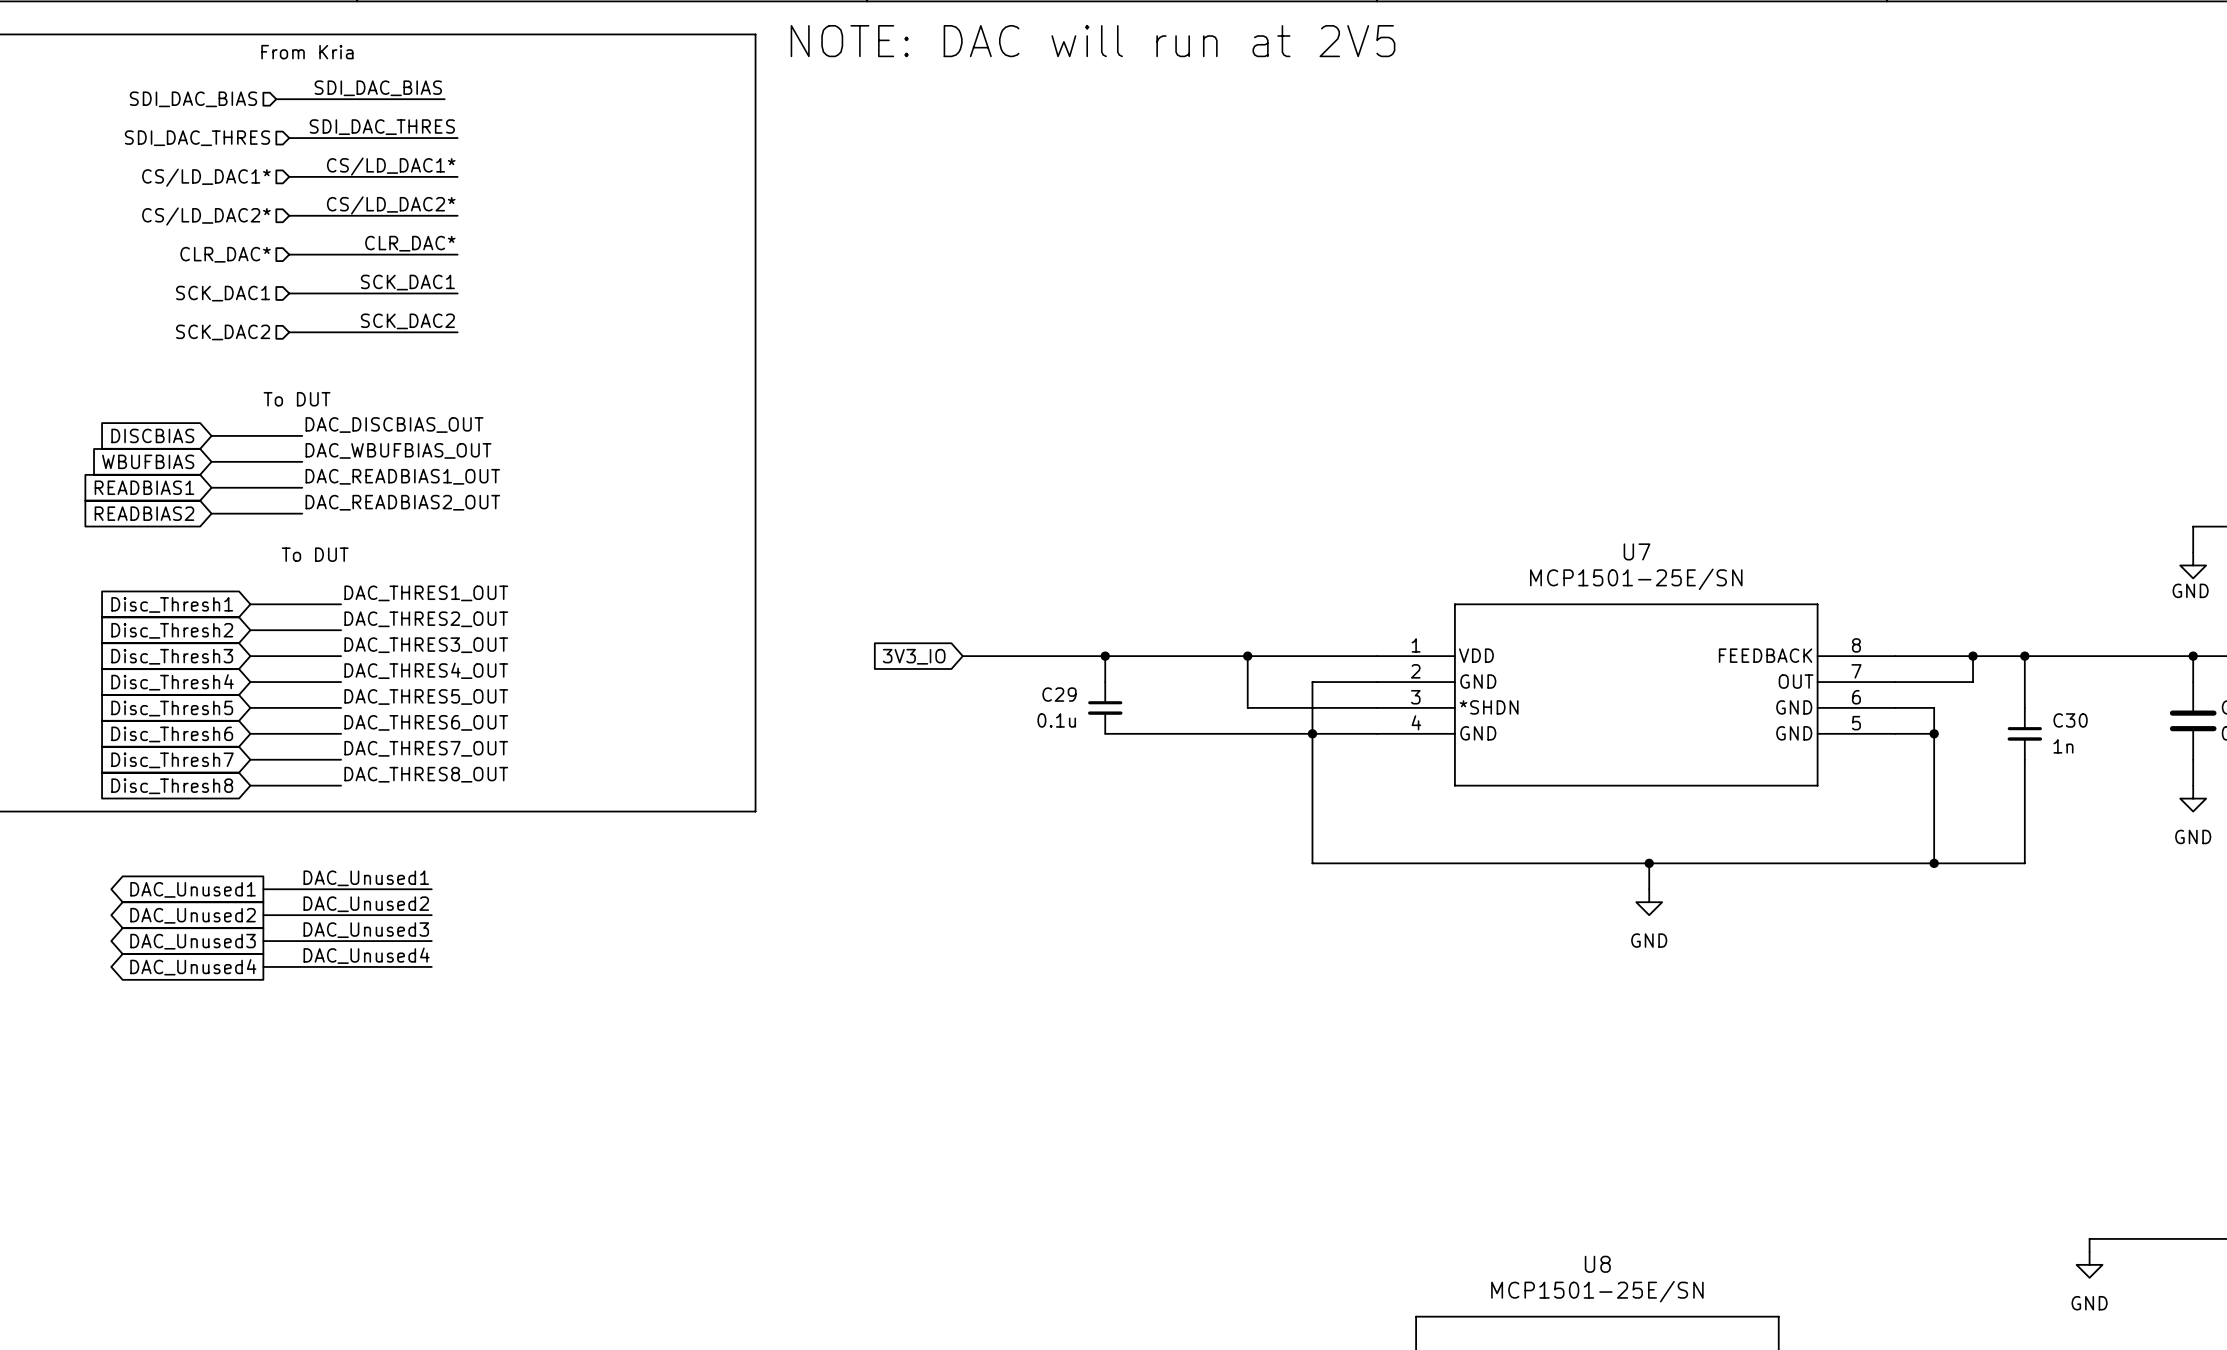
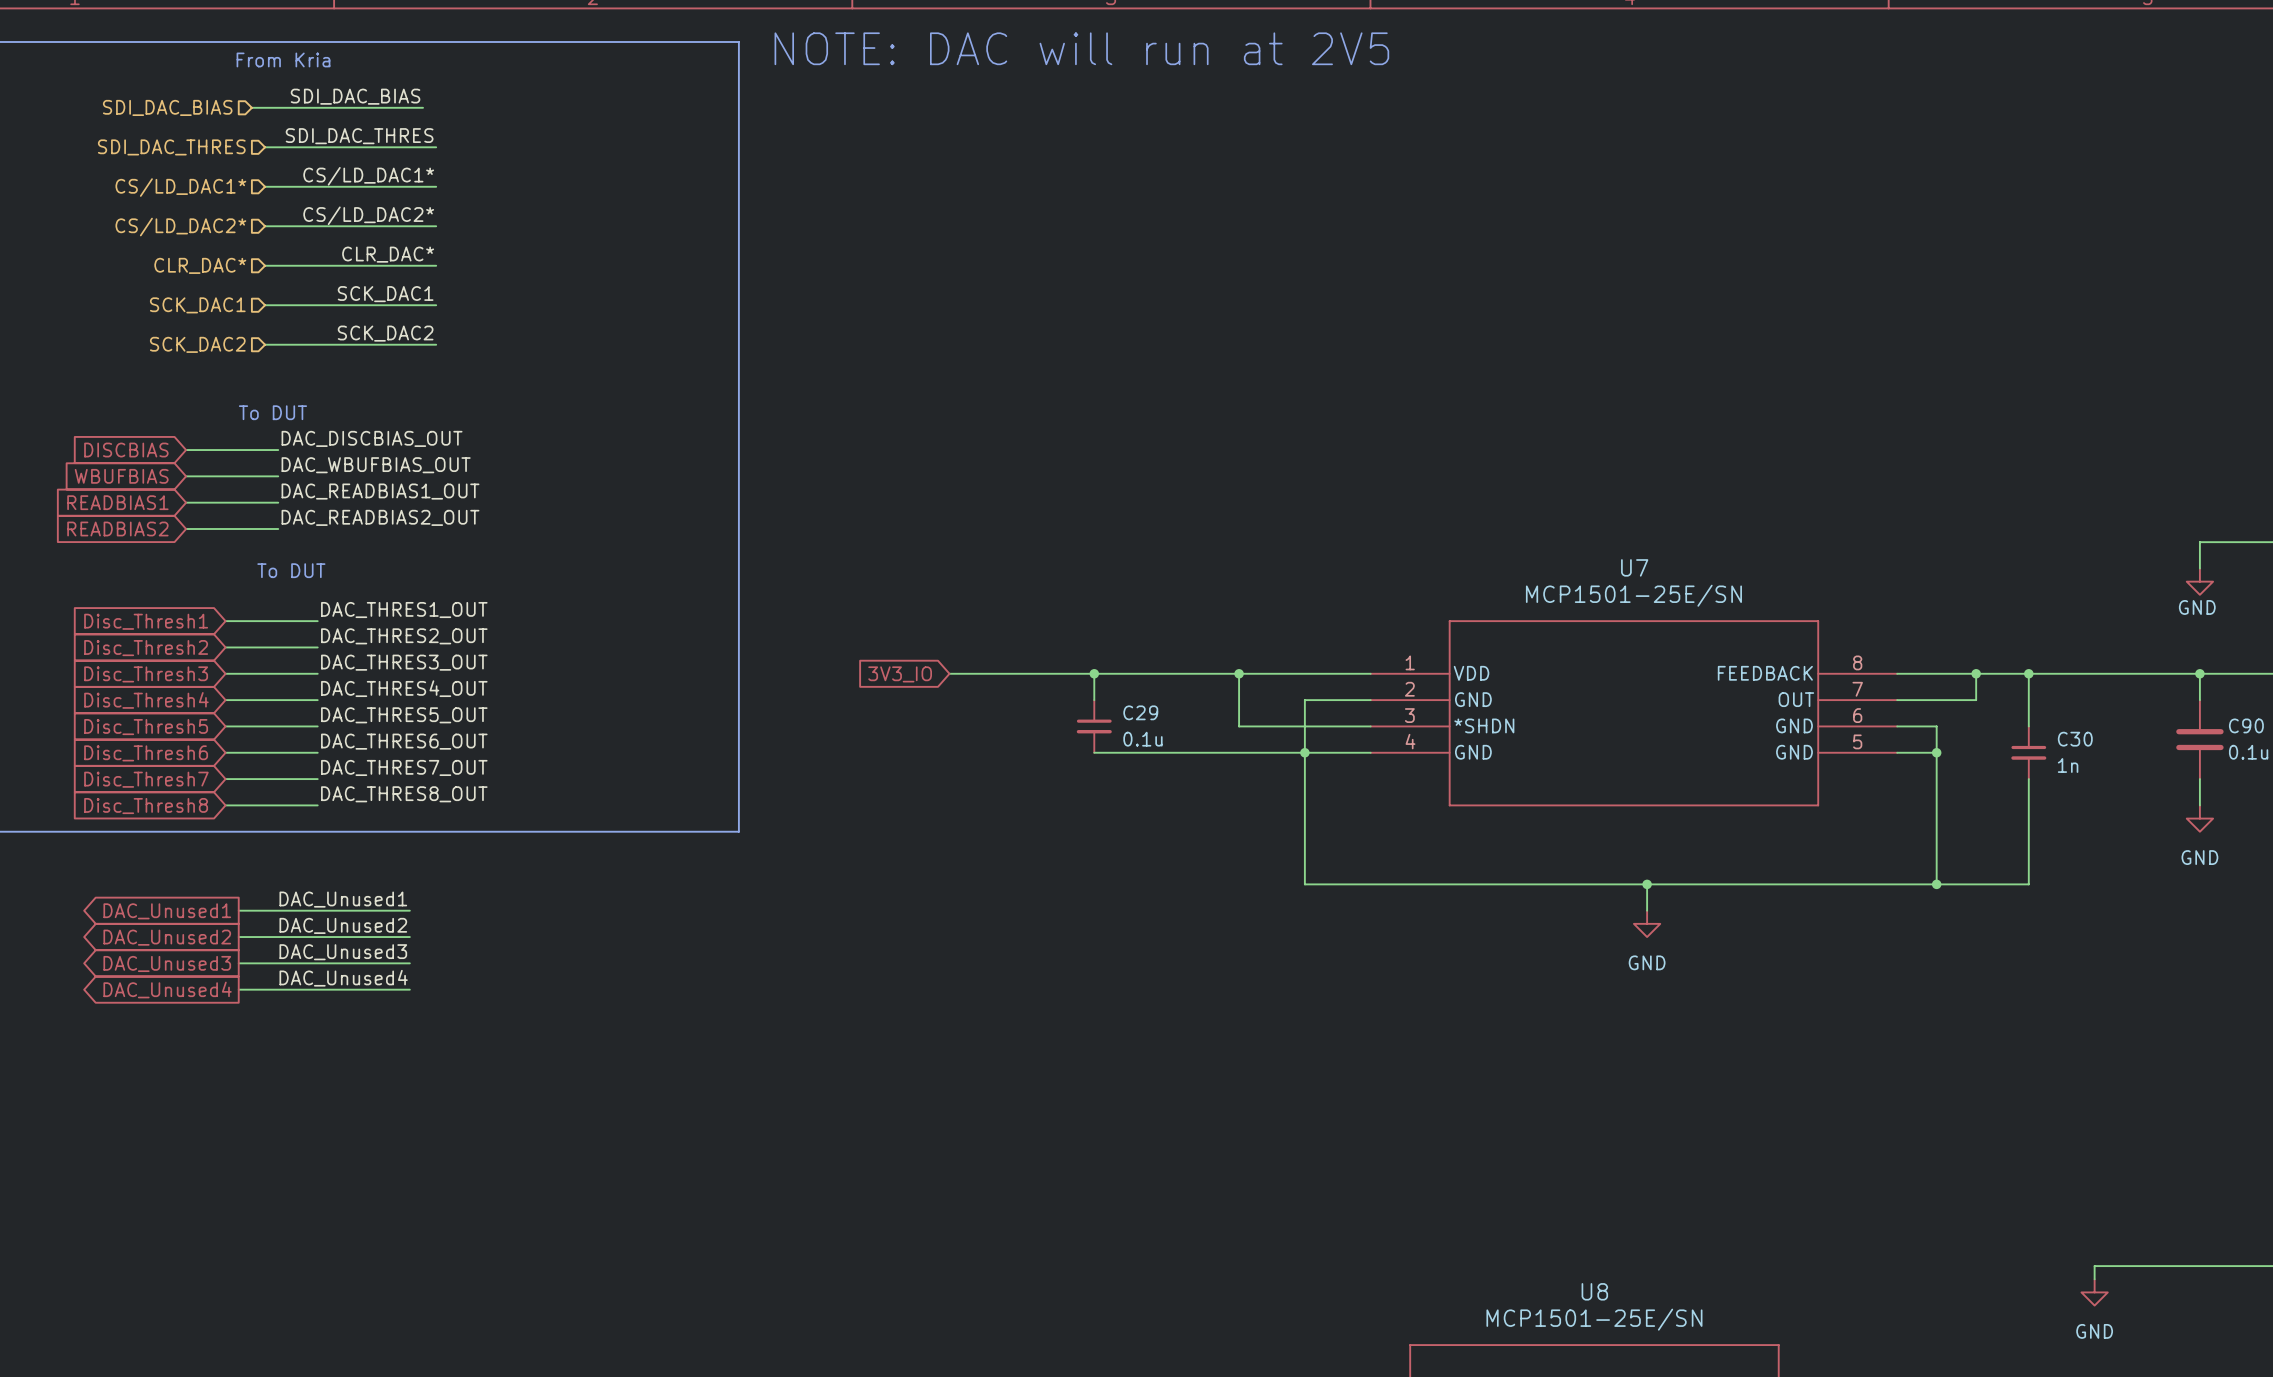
C29 name position: C29 (1059, 694) -> C29 (1140, 712)
C29 value position: 0.1u (1056, 720) -> 0.1u (1142, 739)

